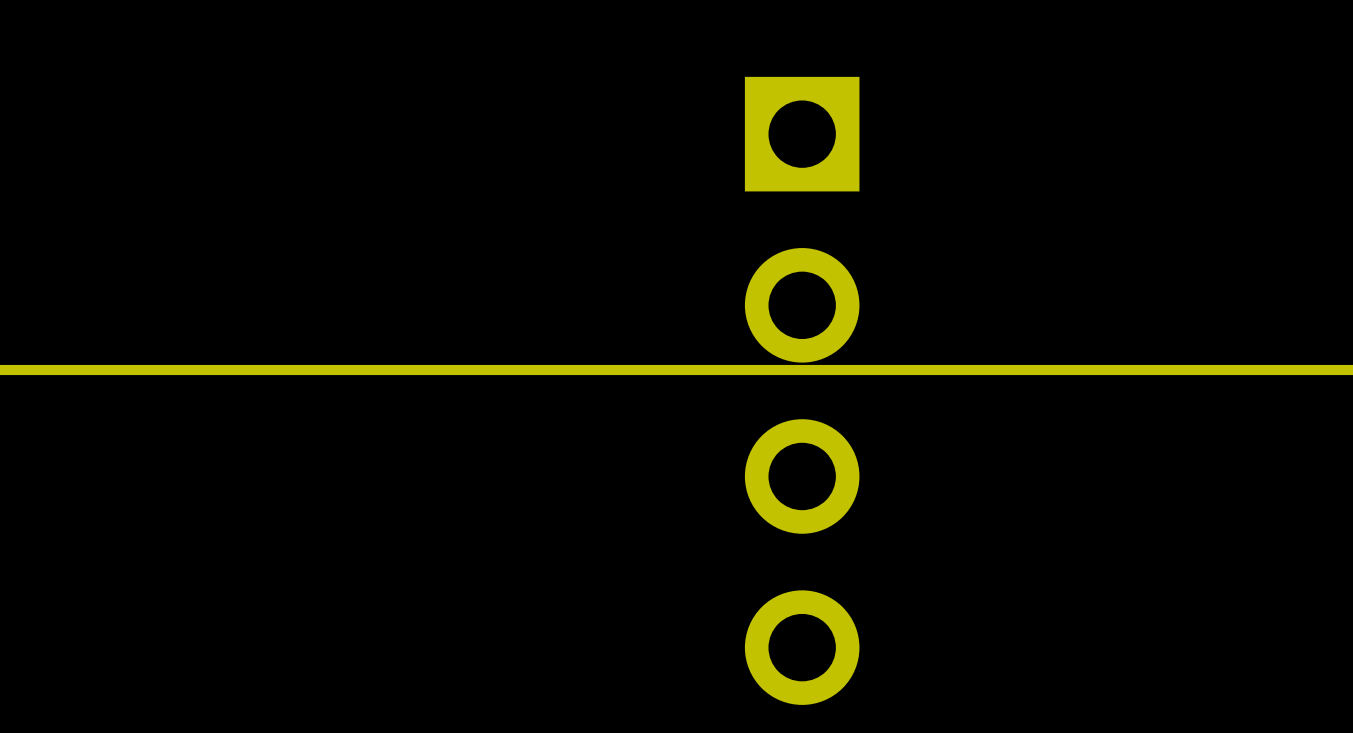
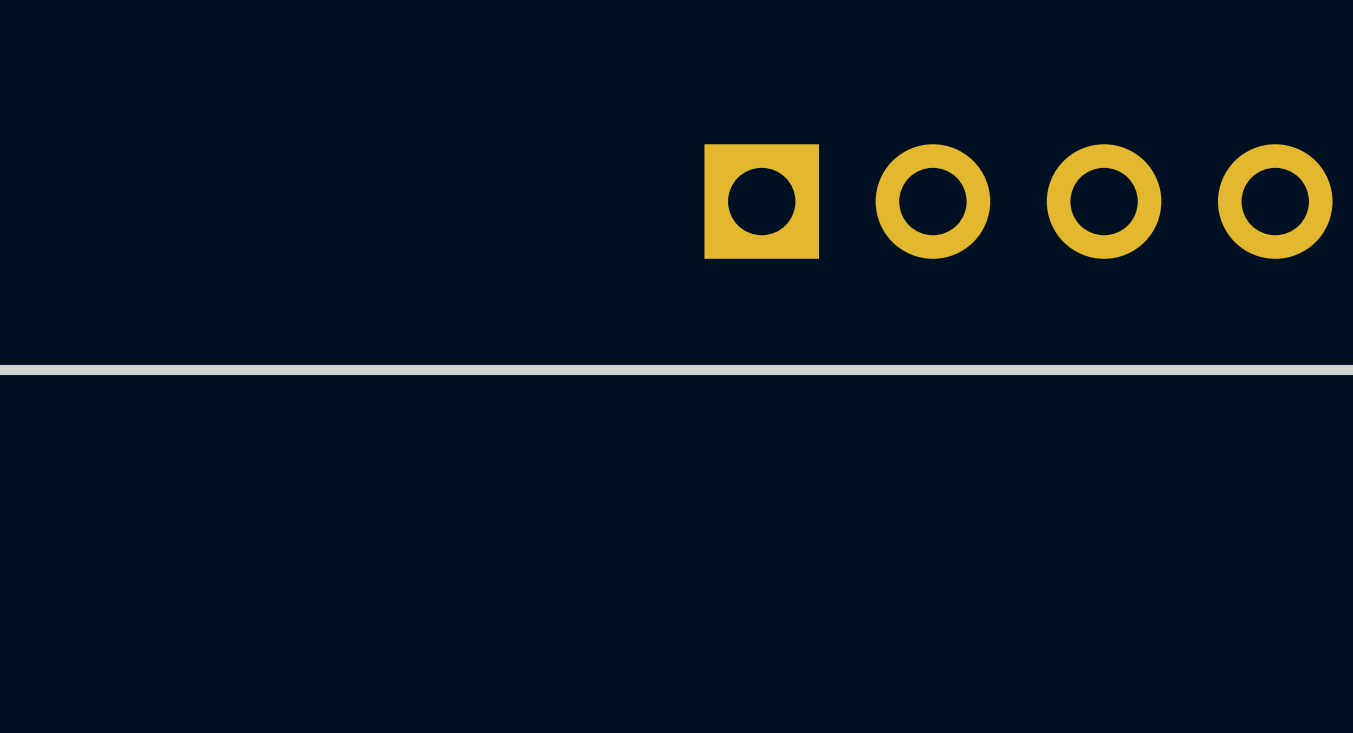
part rotation: 0° (802, 390) -> 90° counterclockwise (1018, 201)

